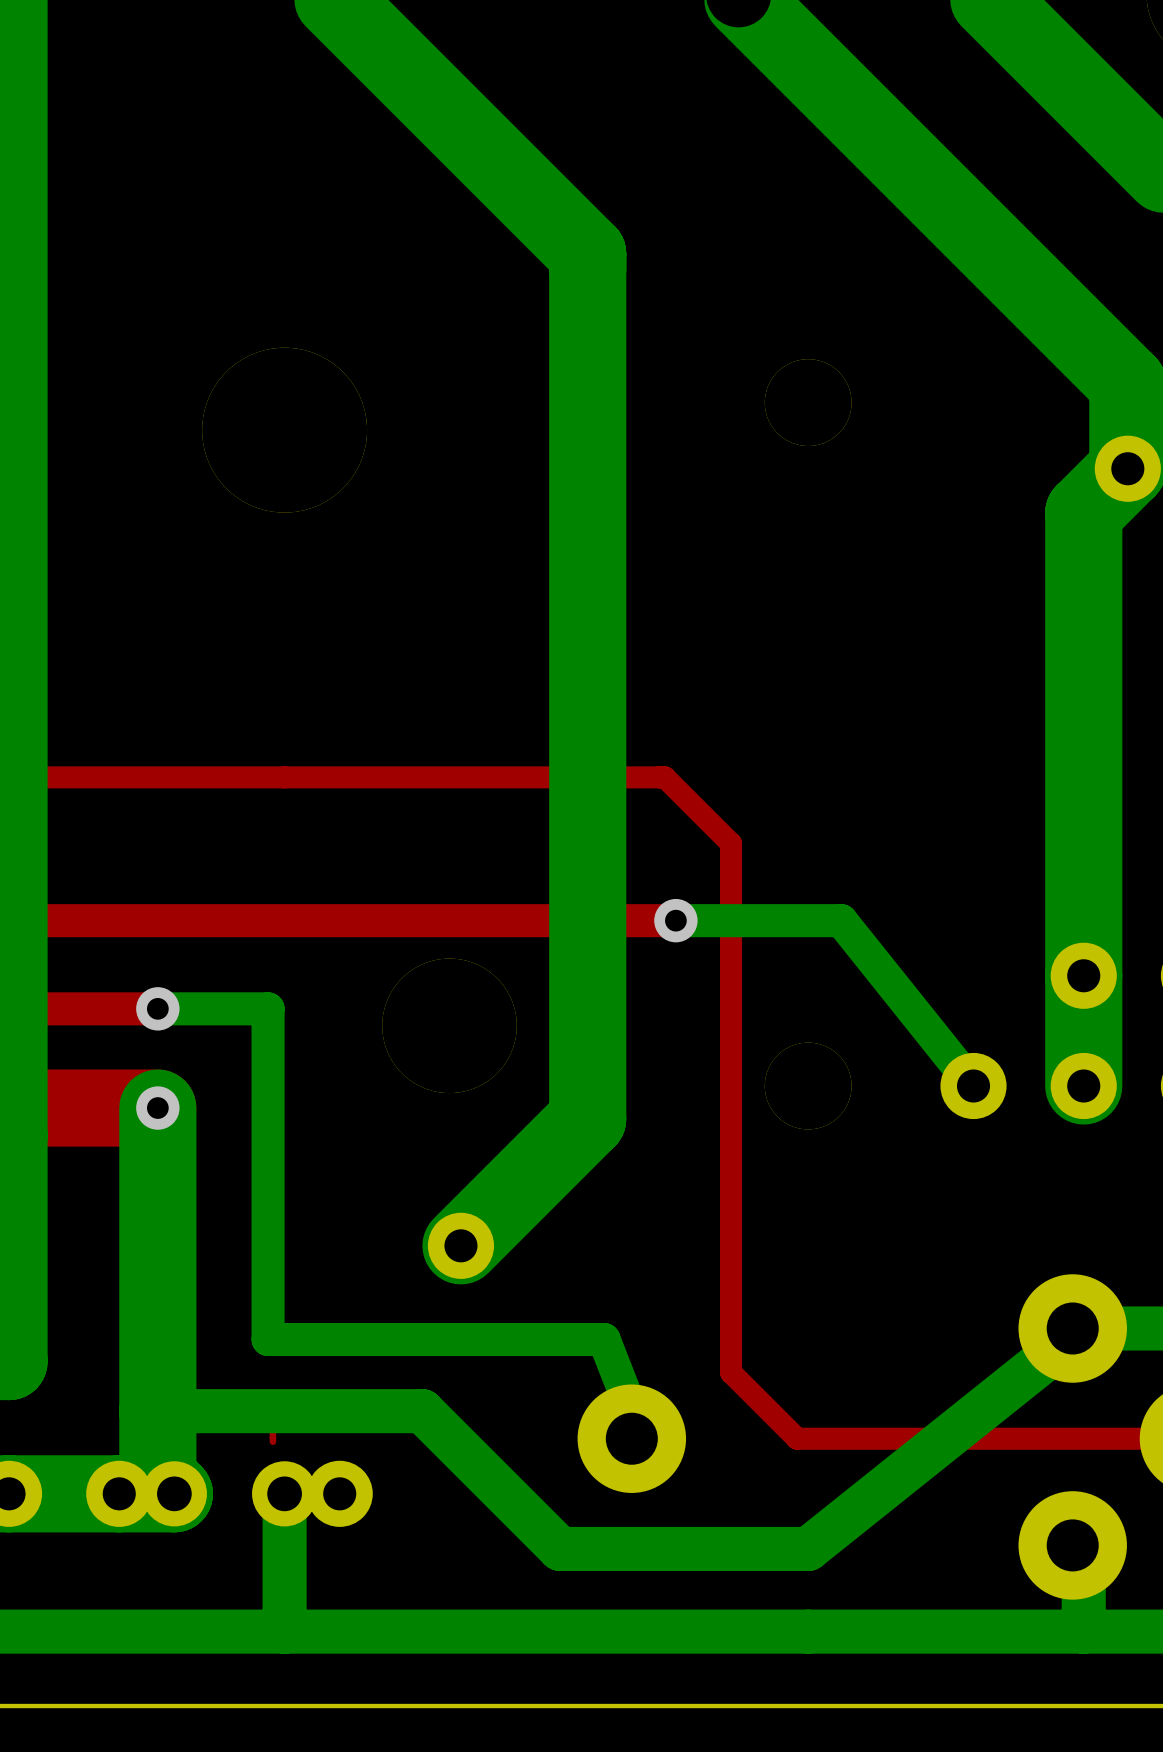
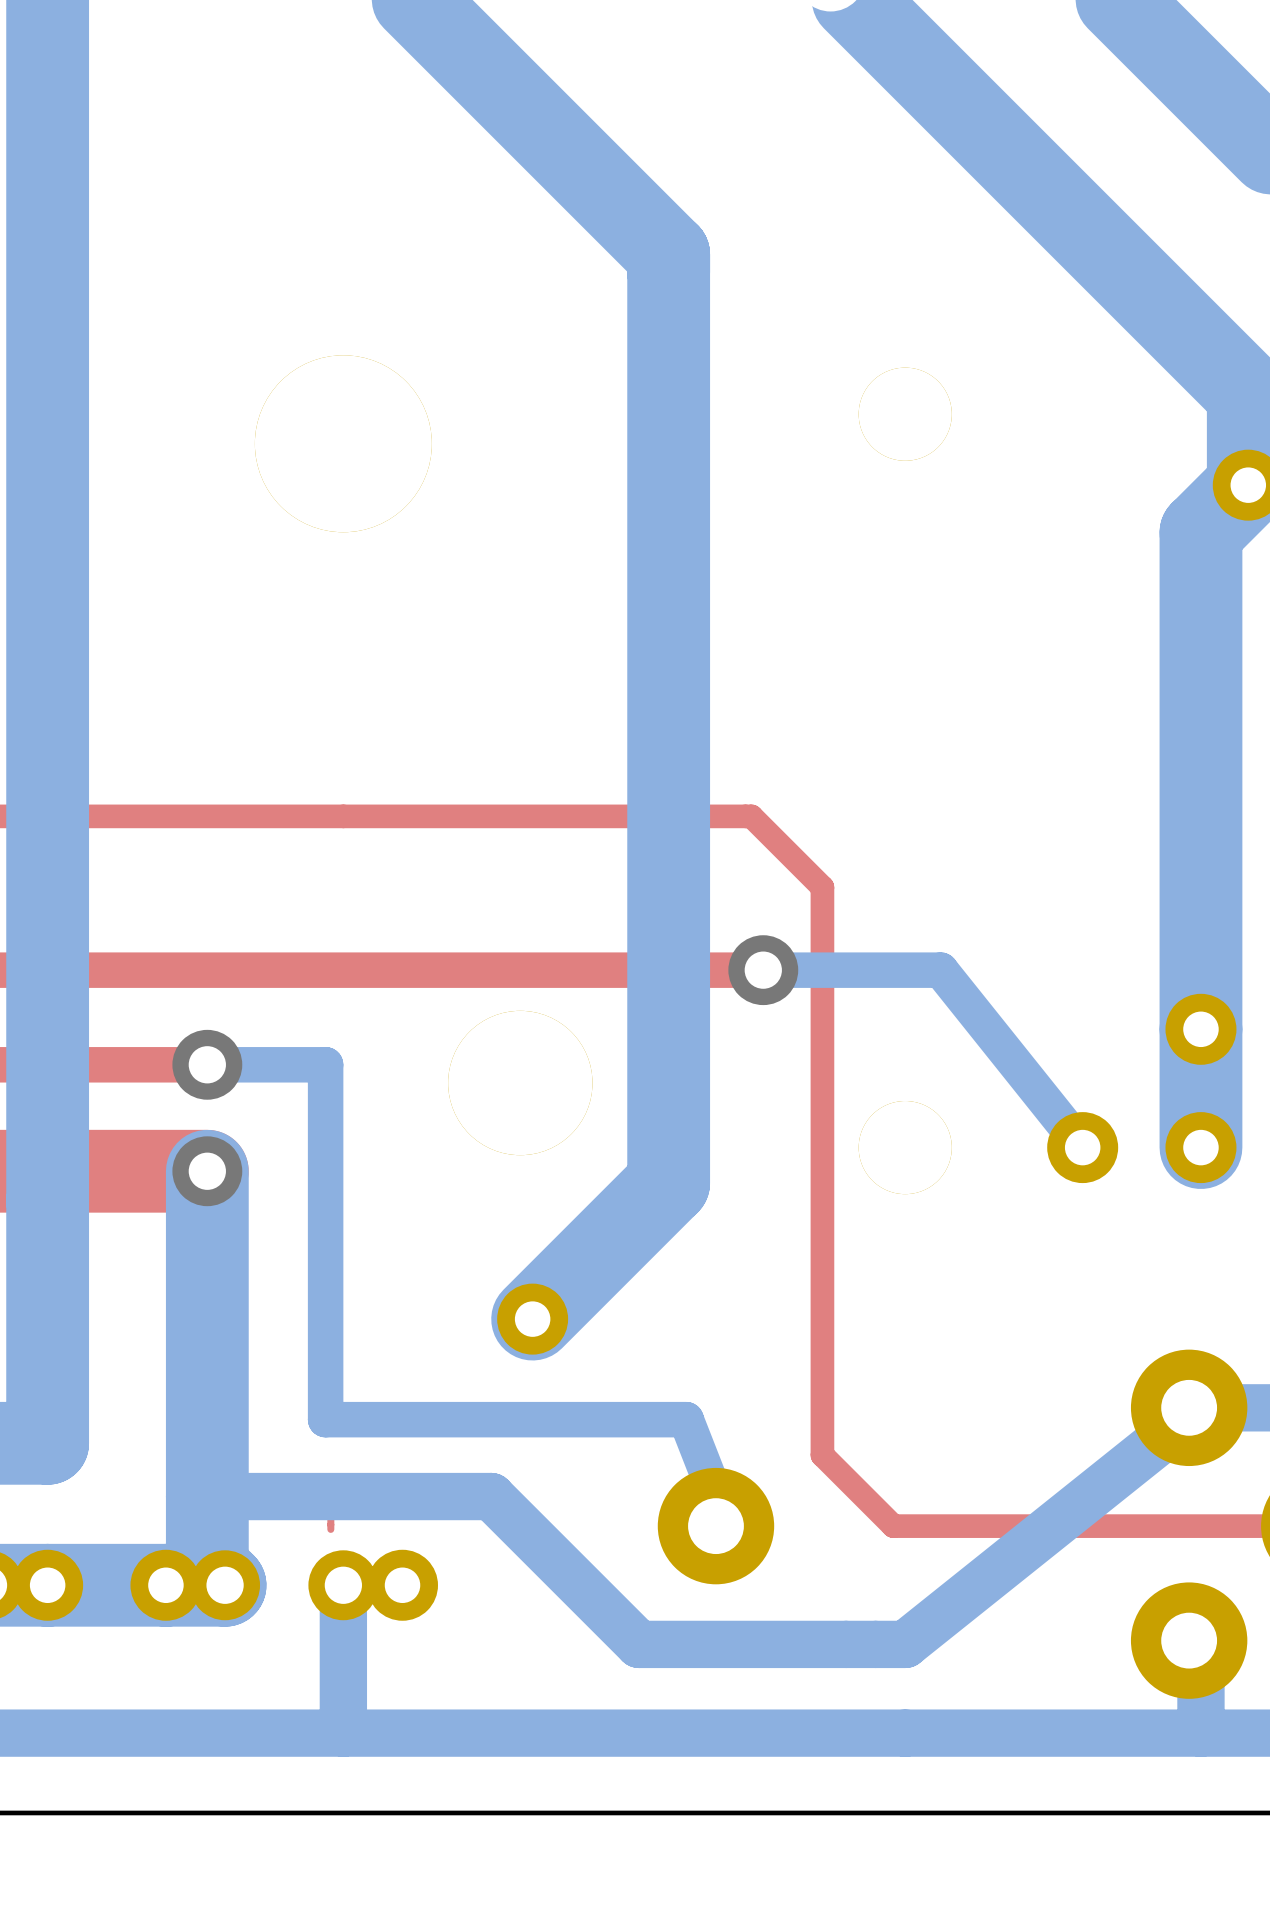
via size: [654, 898, 698, 943] -> [728, 935, 799, 1006]
via size: [136, 987, 180, 1031] -> [172, 1029, 243, 1100]
via size: [136, 1086, 180, 1130] -> [172, 1136, 243, 1207]

